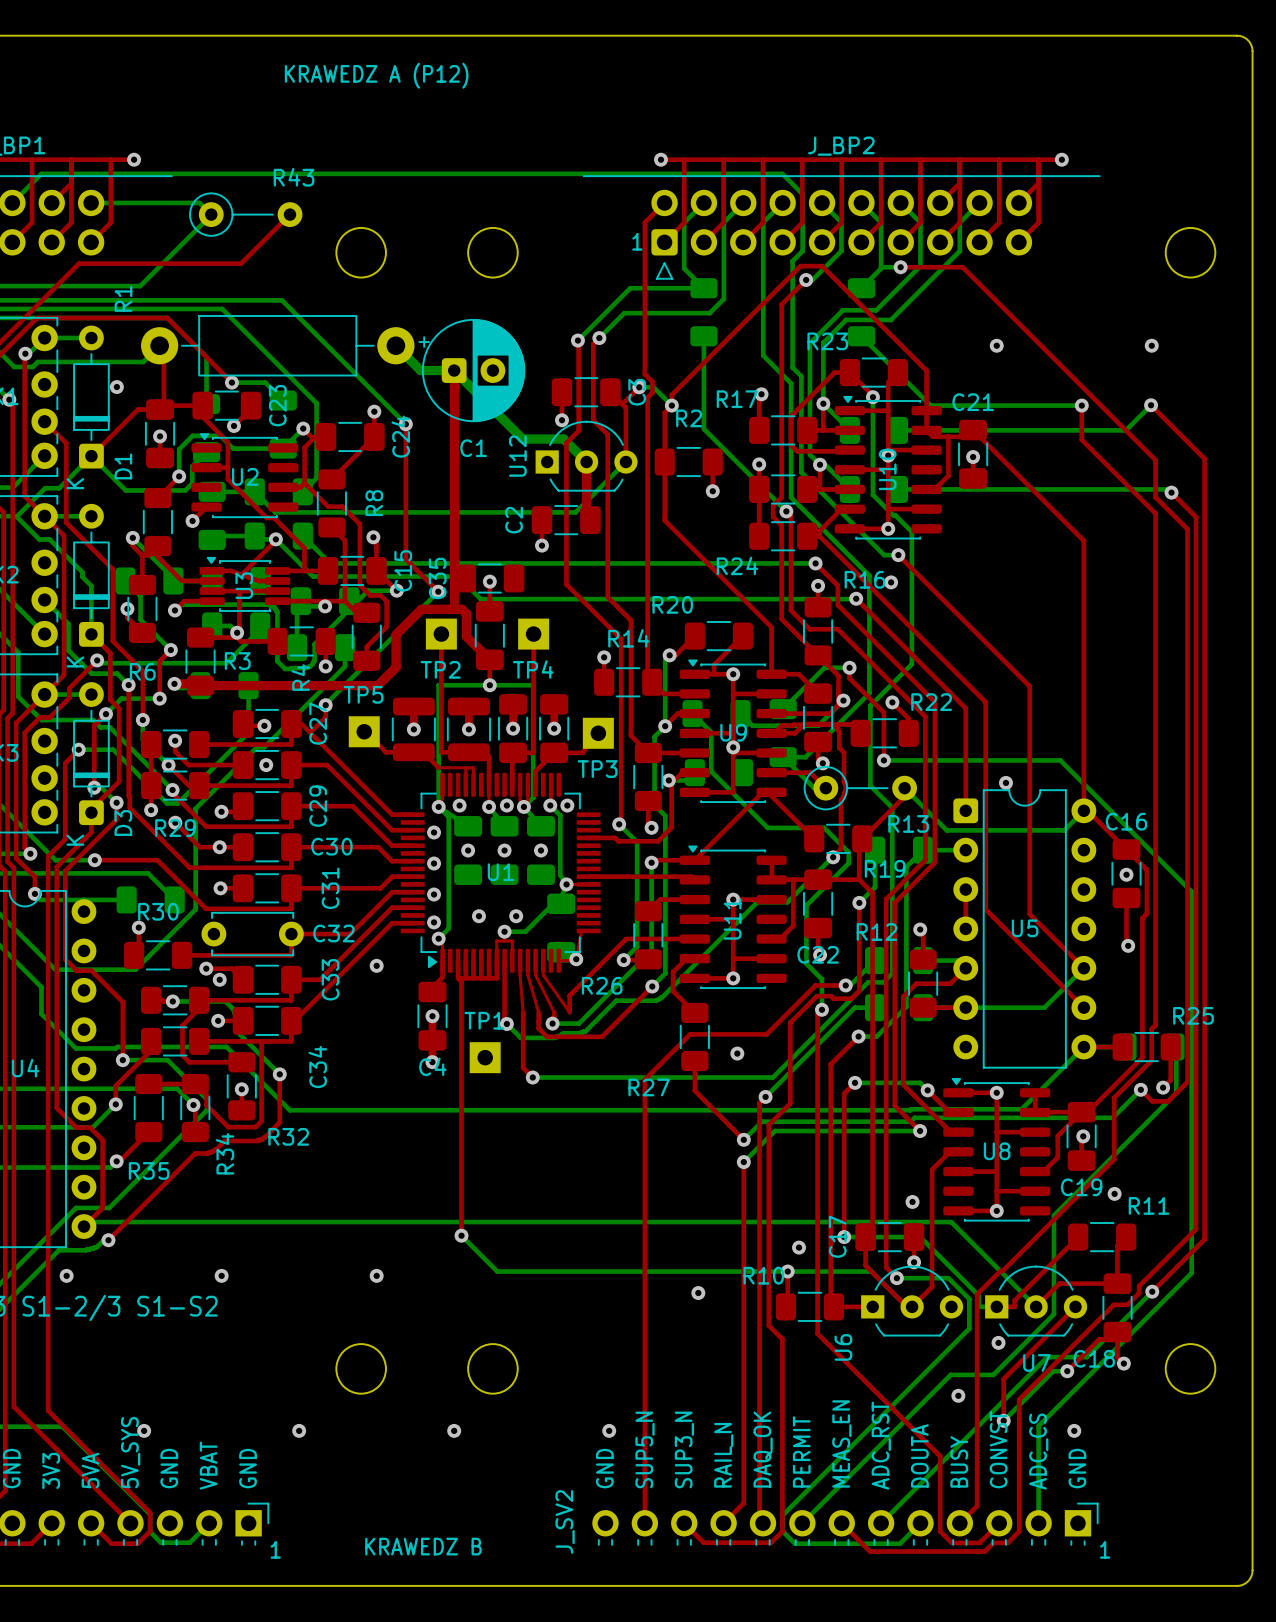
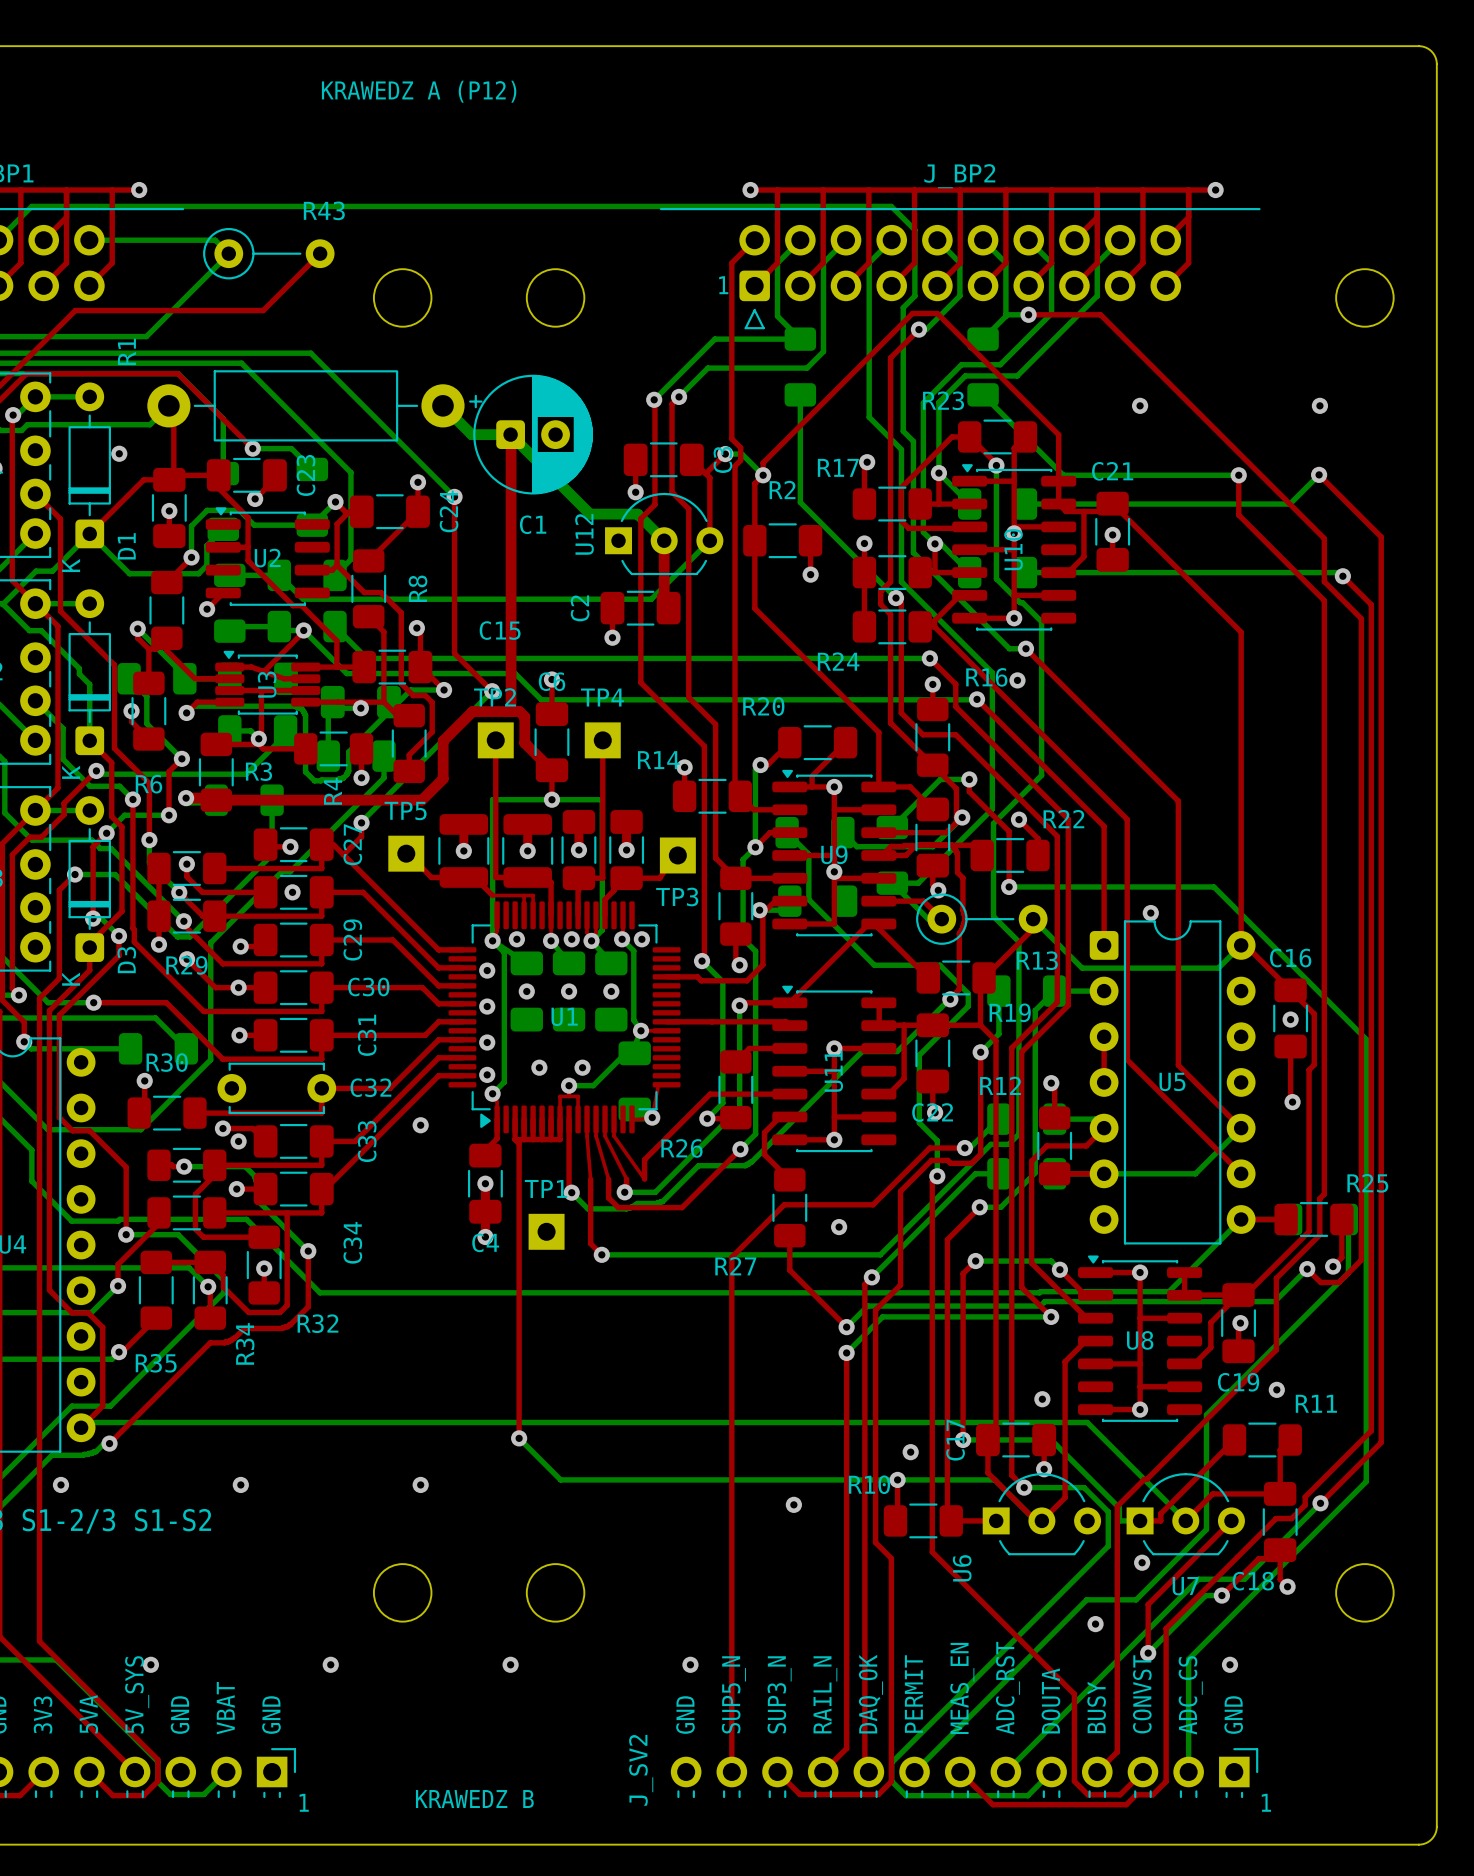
C15 name rotation: 0° (403, 570) -> 90° clockwise (500, 630)
C35: (489, 578) -> none
C6 name: none -> C6 (552, 681)
R14 name position: R14 (628, 638) -> R14 (658, 760)
TP2 name position: TP2 (440, 669) -> TP2 (495, 697)
TP4 name position: TP4 (533, 669) -> TP4 (602, 697)

